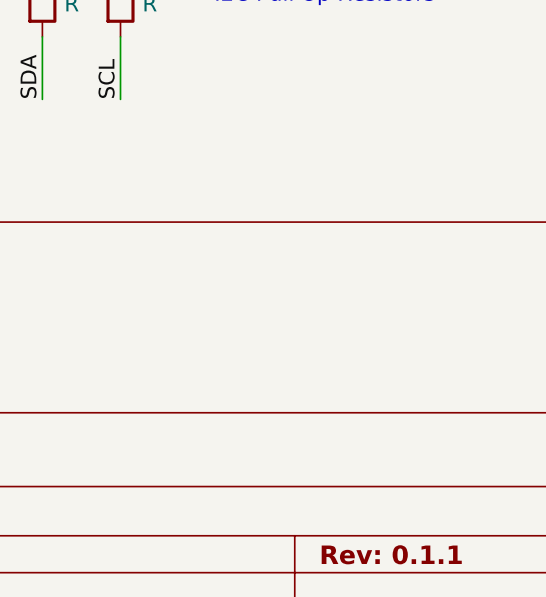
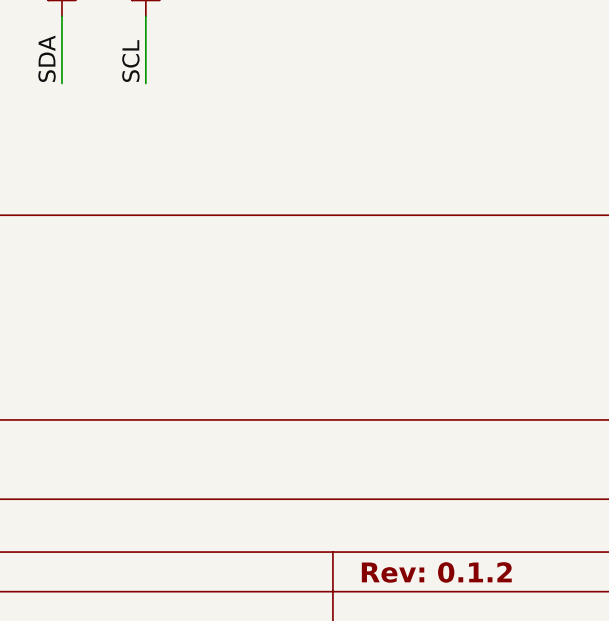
title block: Rev: 0.1.1 (391, 554) -> Rev: 0.1.2 (436, 572)

